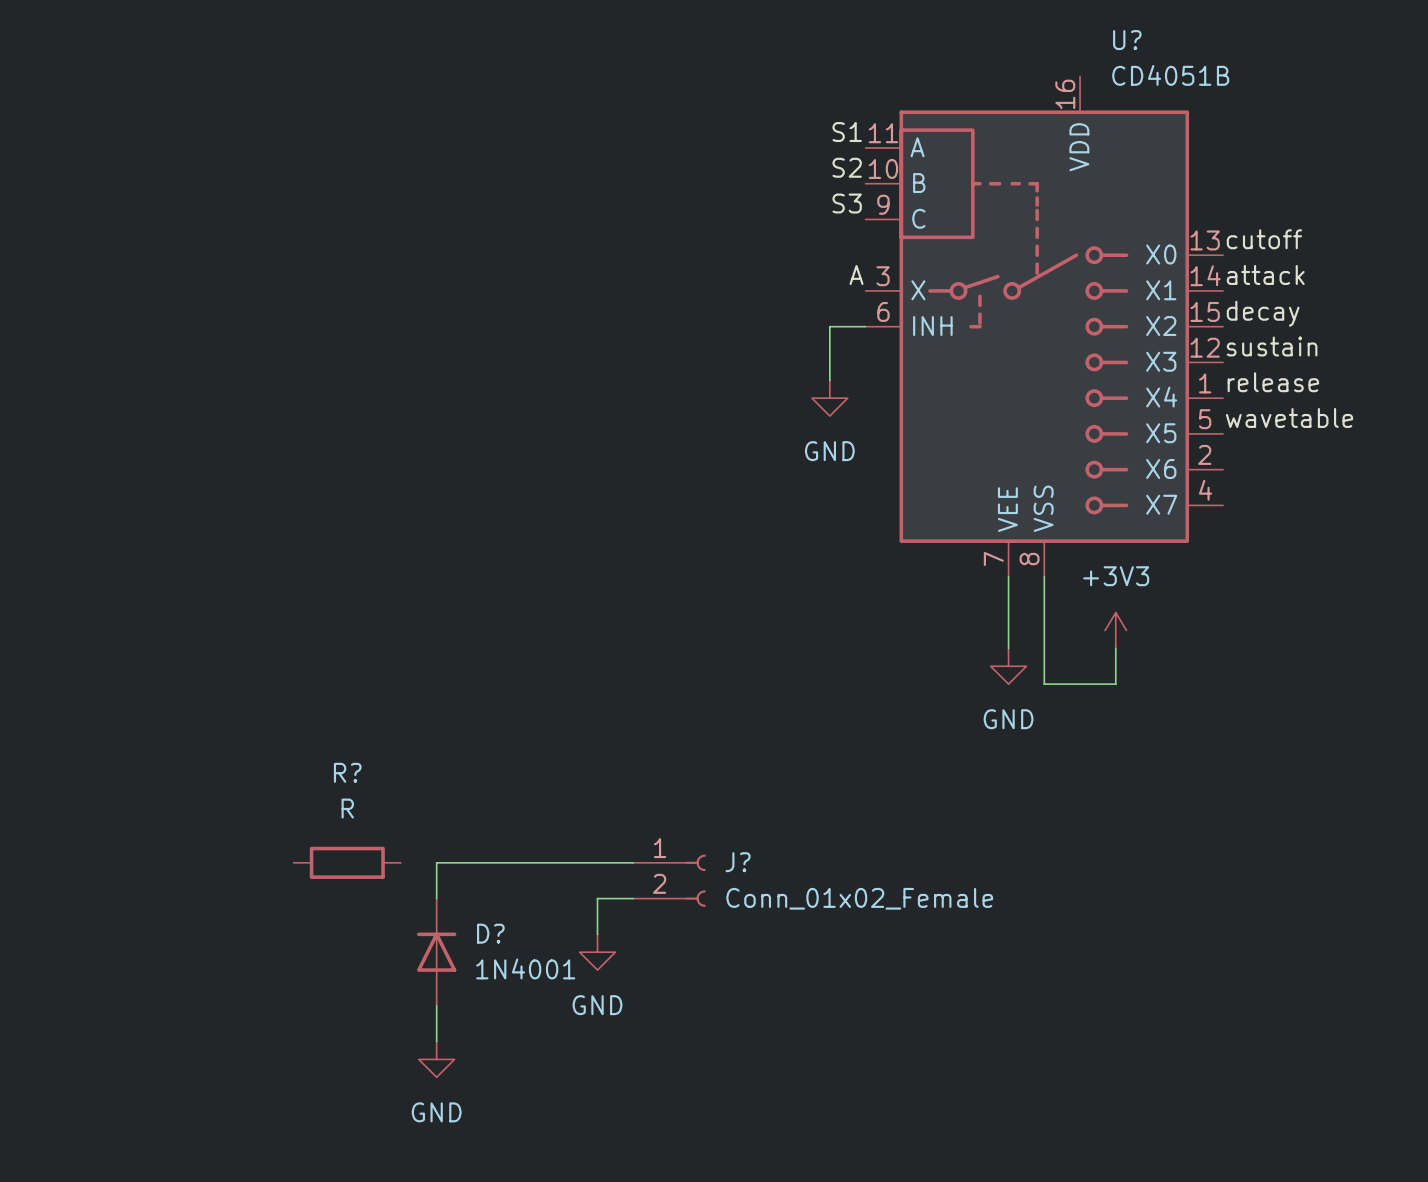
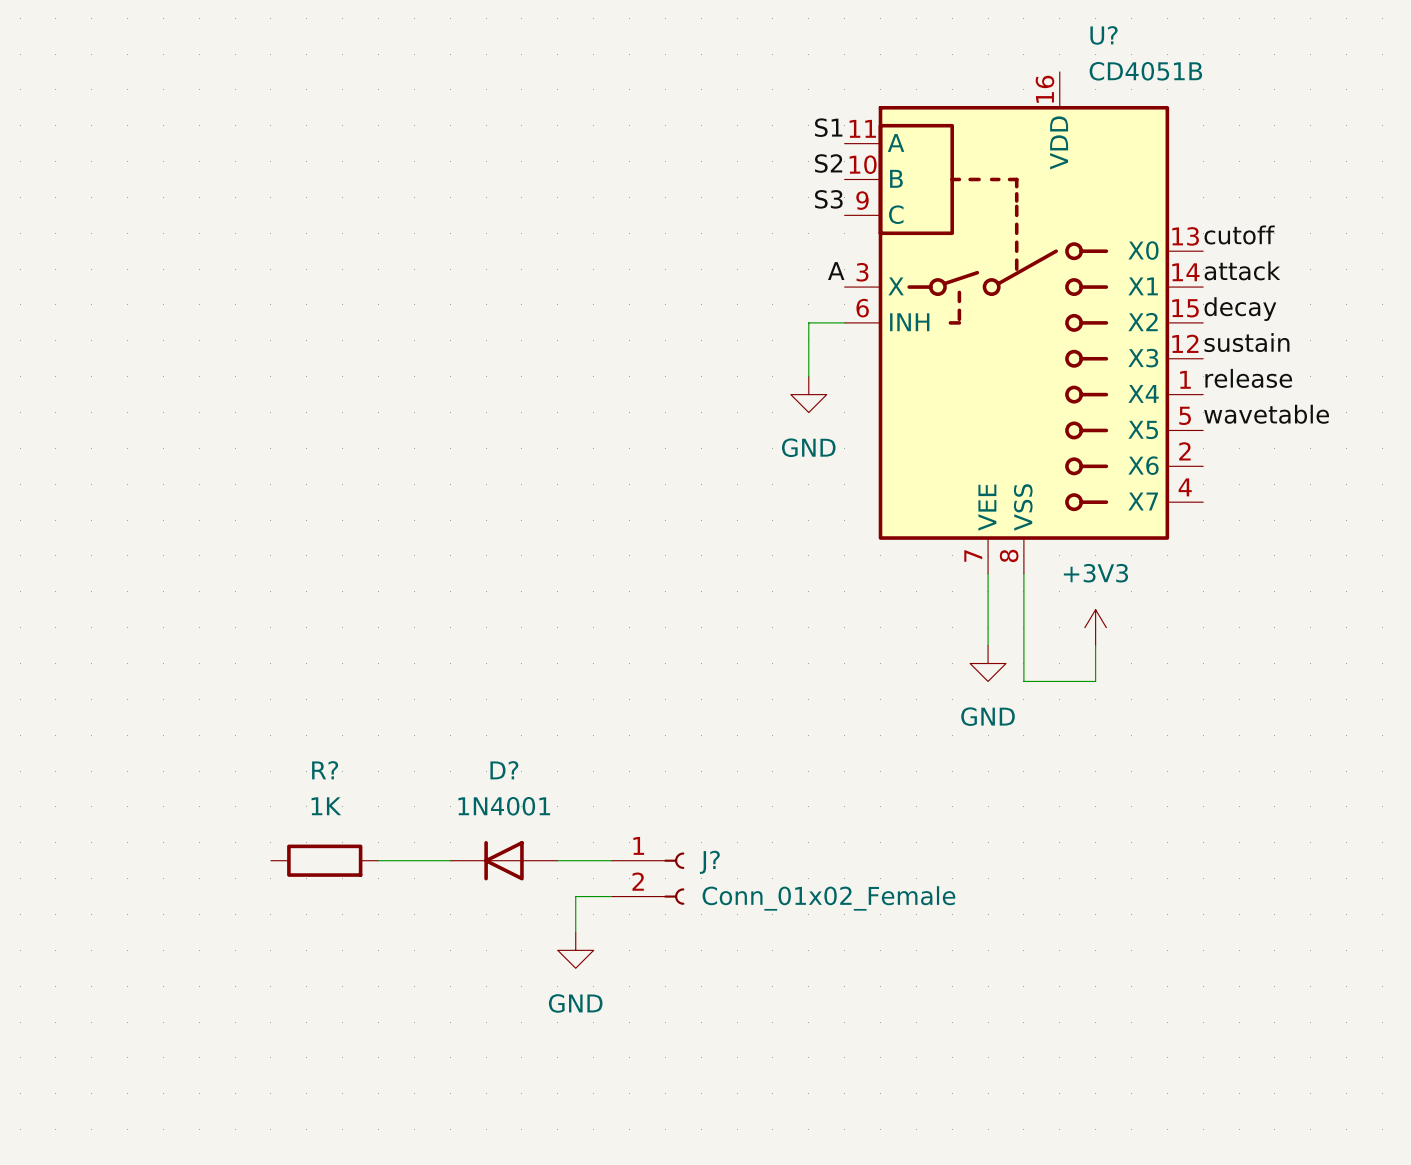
R? value: R (347, 808) -> 1K (326, 806)
wire: (436, 862) (436, 898) -> (414, 860) (378, 860)
D? name position: D? (490, 933) -> D? (504, 770)
D? rotation: 0° (436, 952) -> 90° counterclockwise (504, 860)
D? position: (436, 952) -> (504, 860)
D? value position: 1N4001 (525, 968) -> 1N4001 (504, 806)
wire: (436, 1005) (436, 1041) -> none
power symbol: GND (436, 1059) -> none

